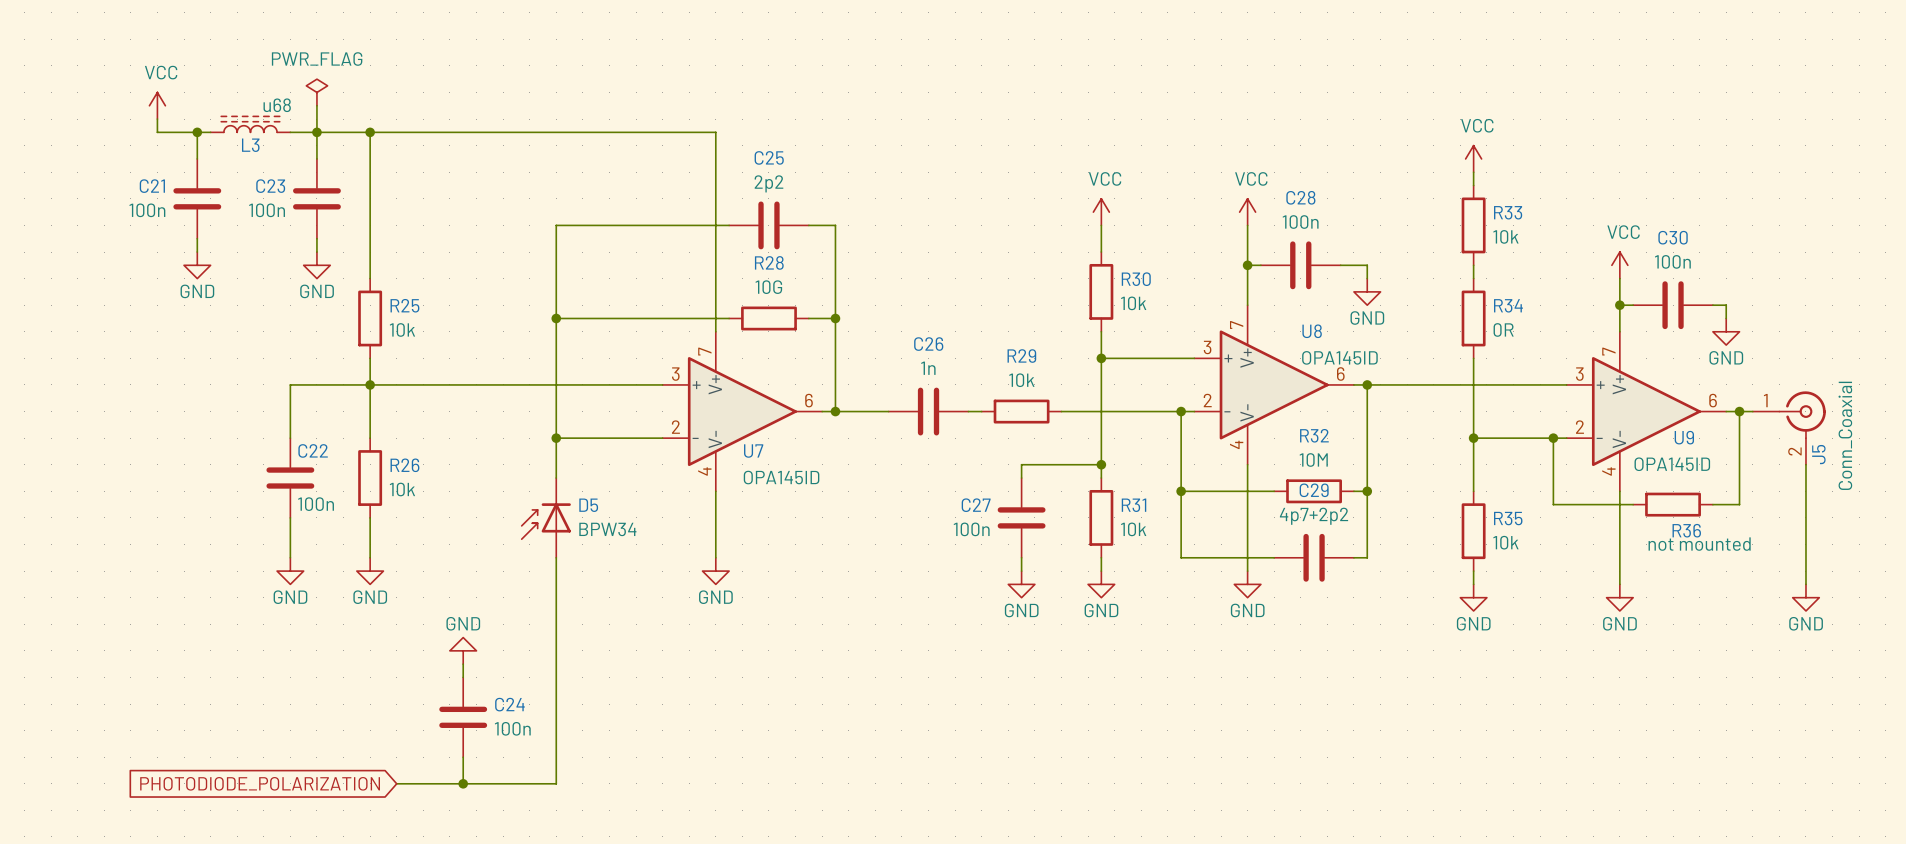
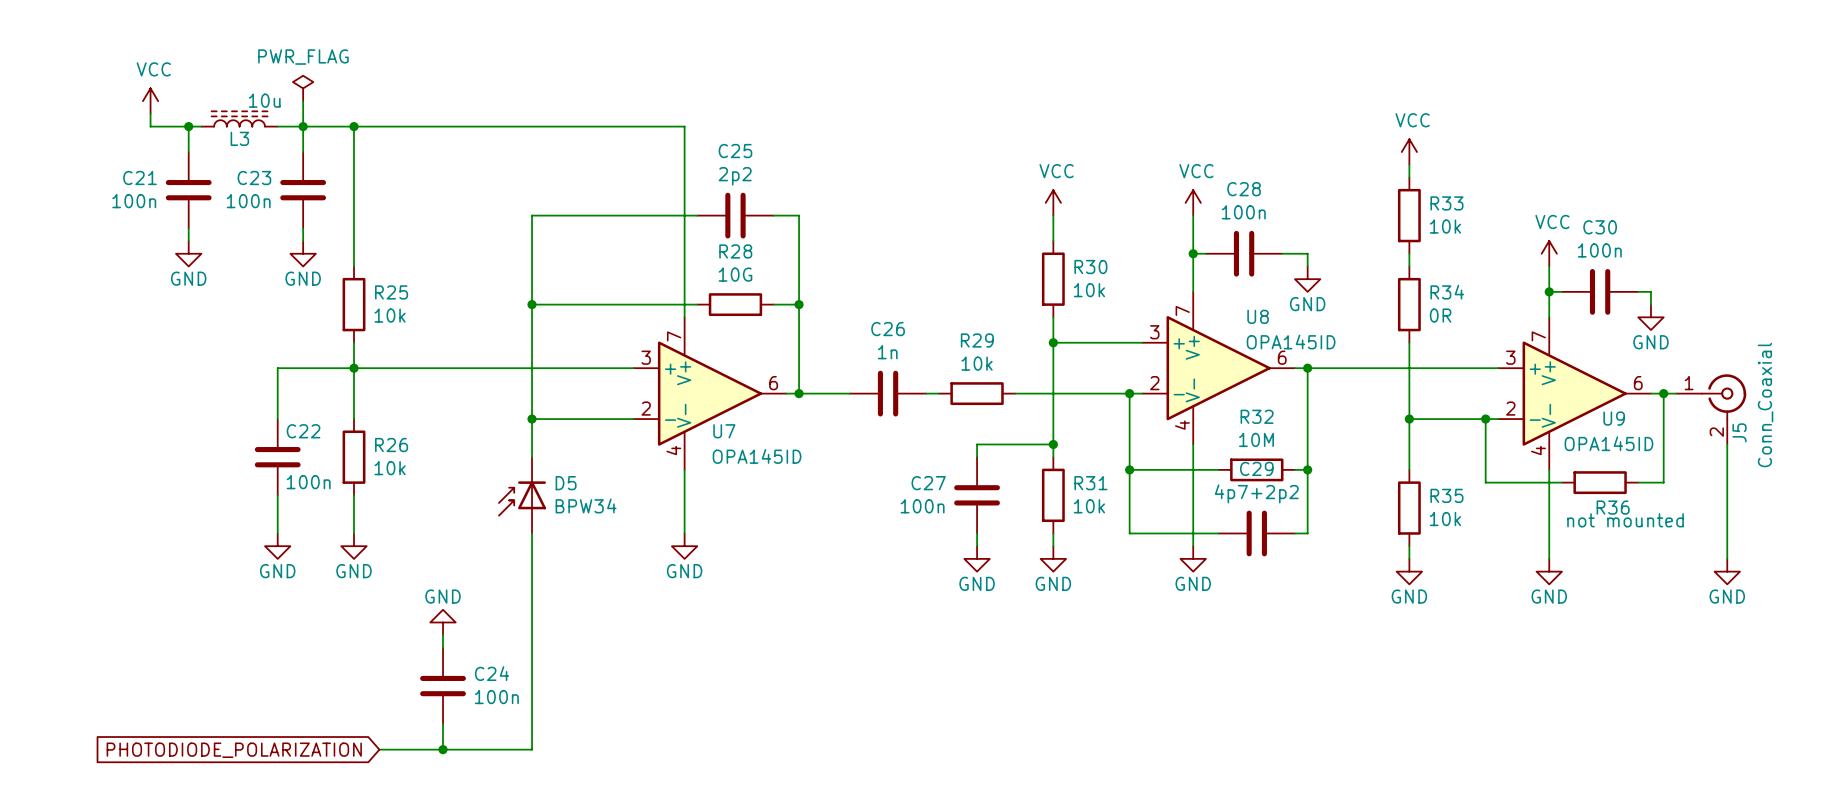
L3 value: u68 (277, 105) -> 10u (264, 100)

